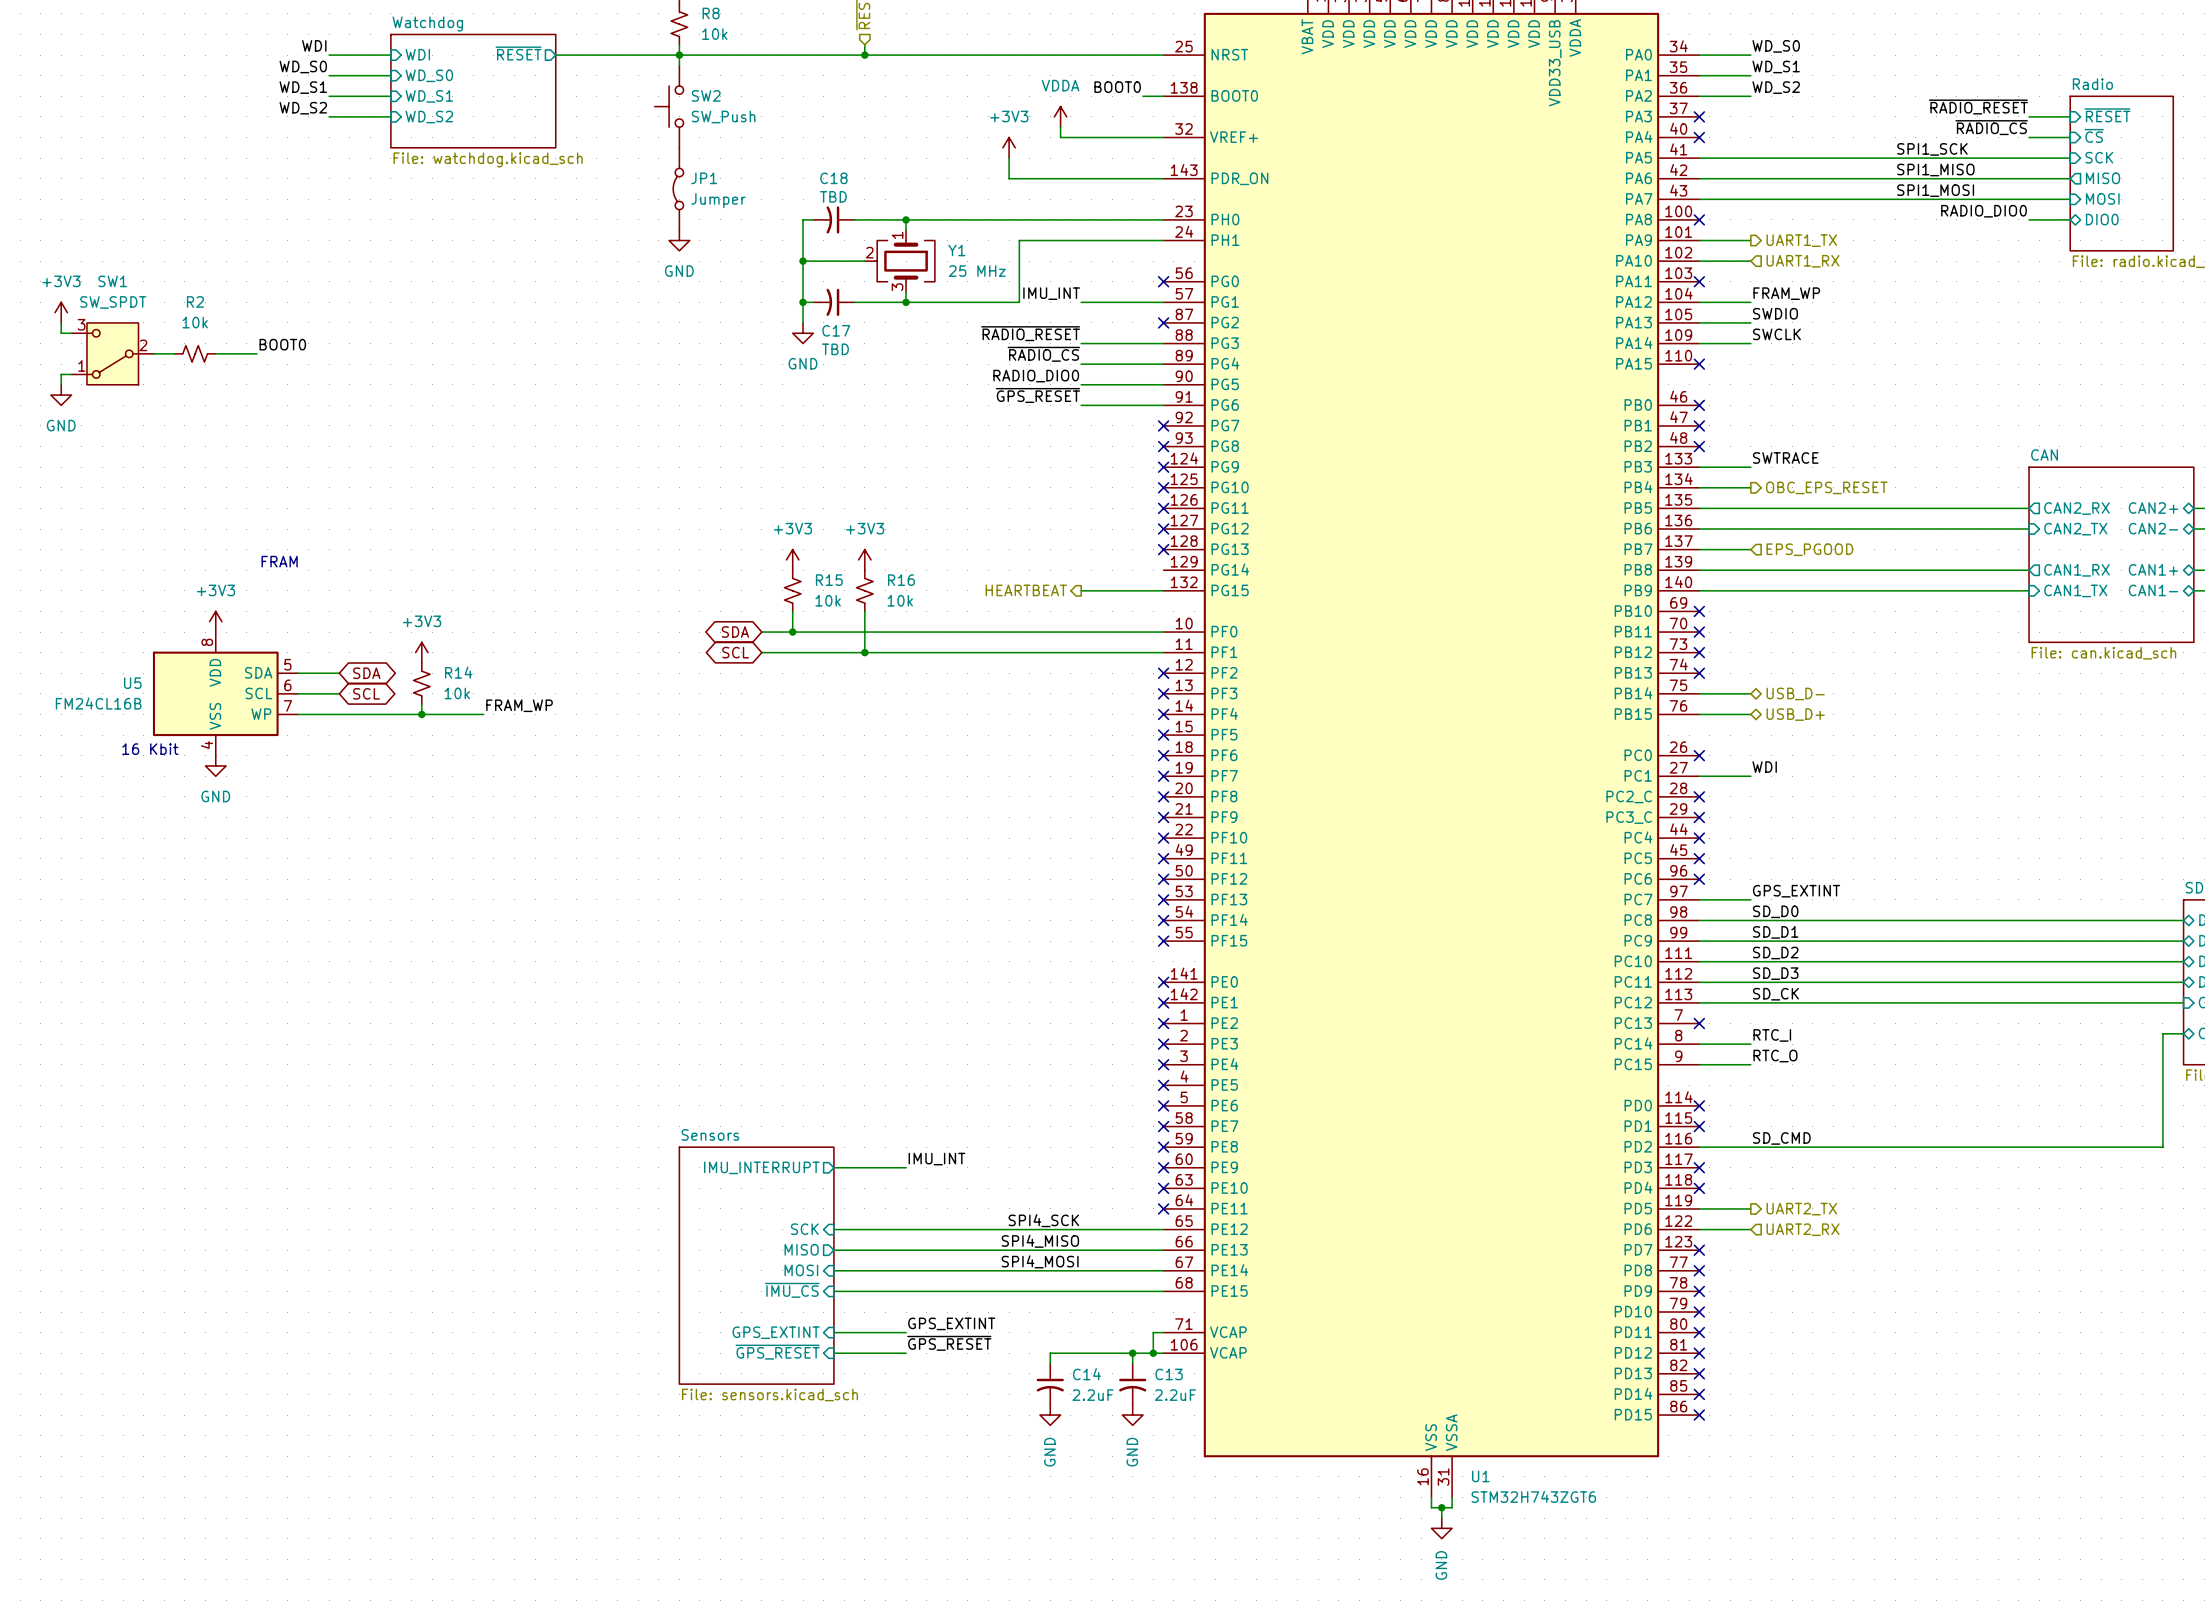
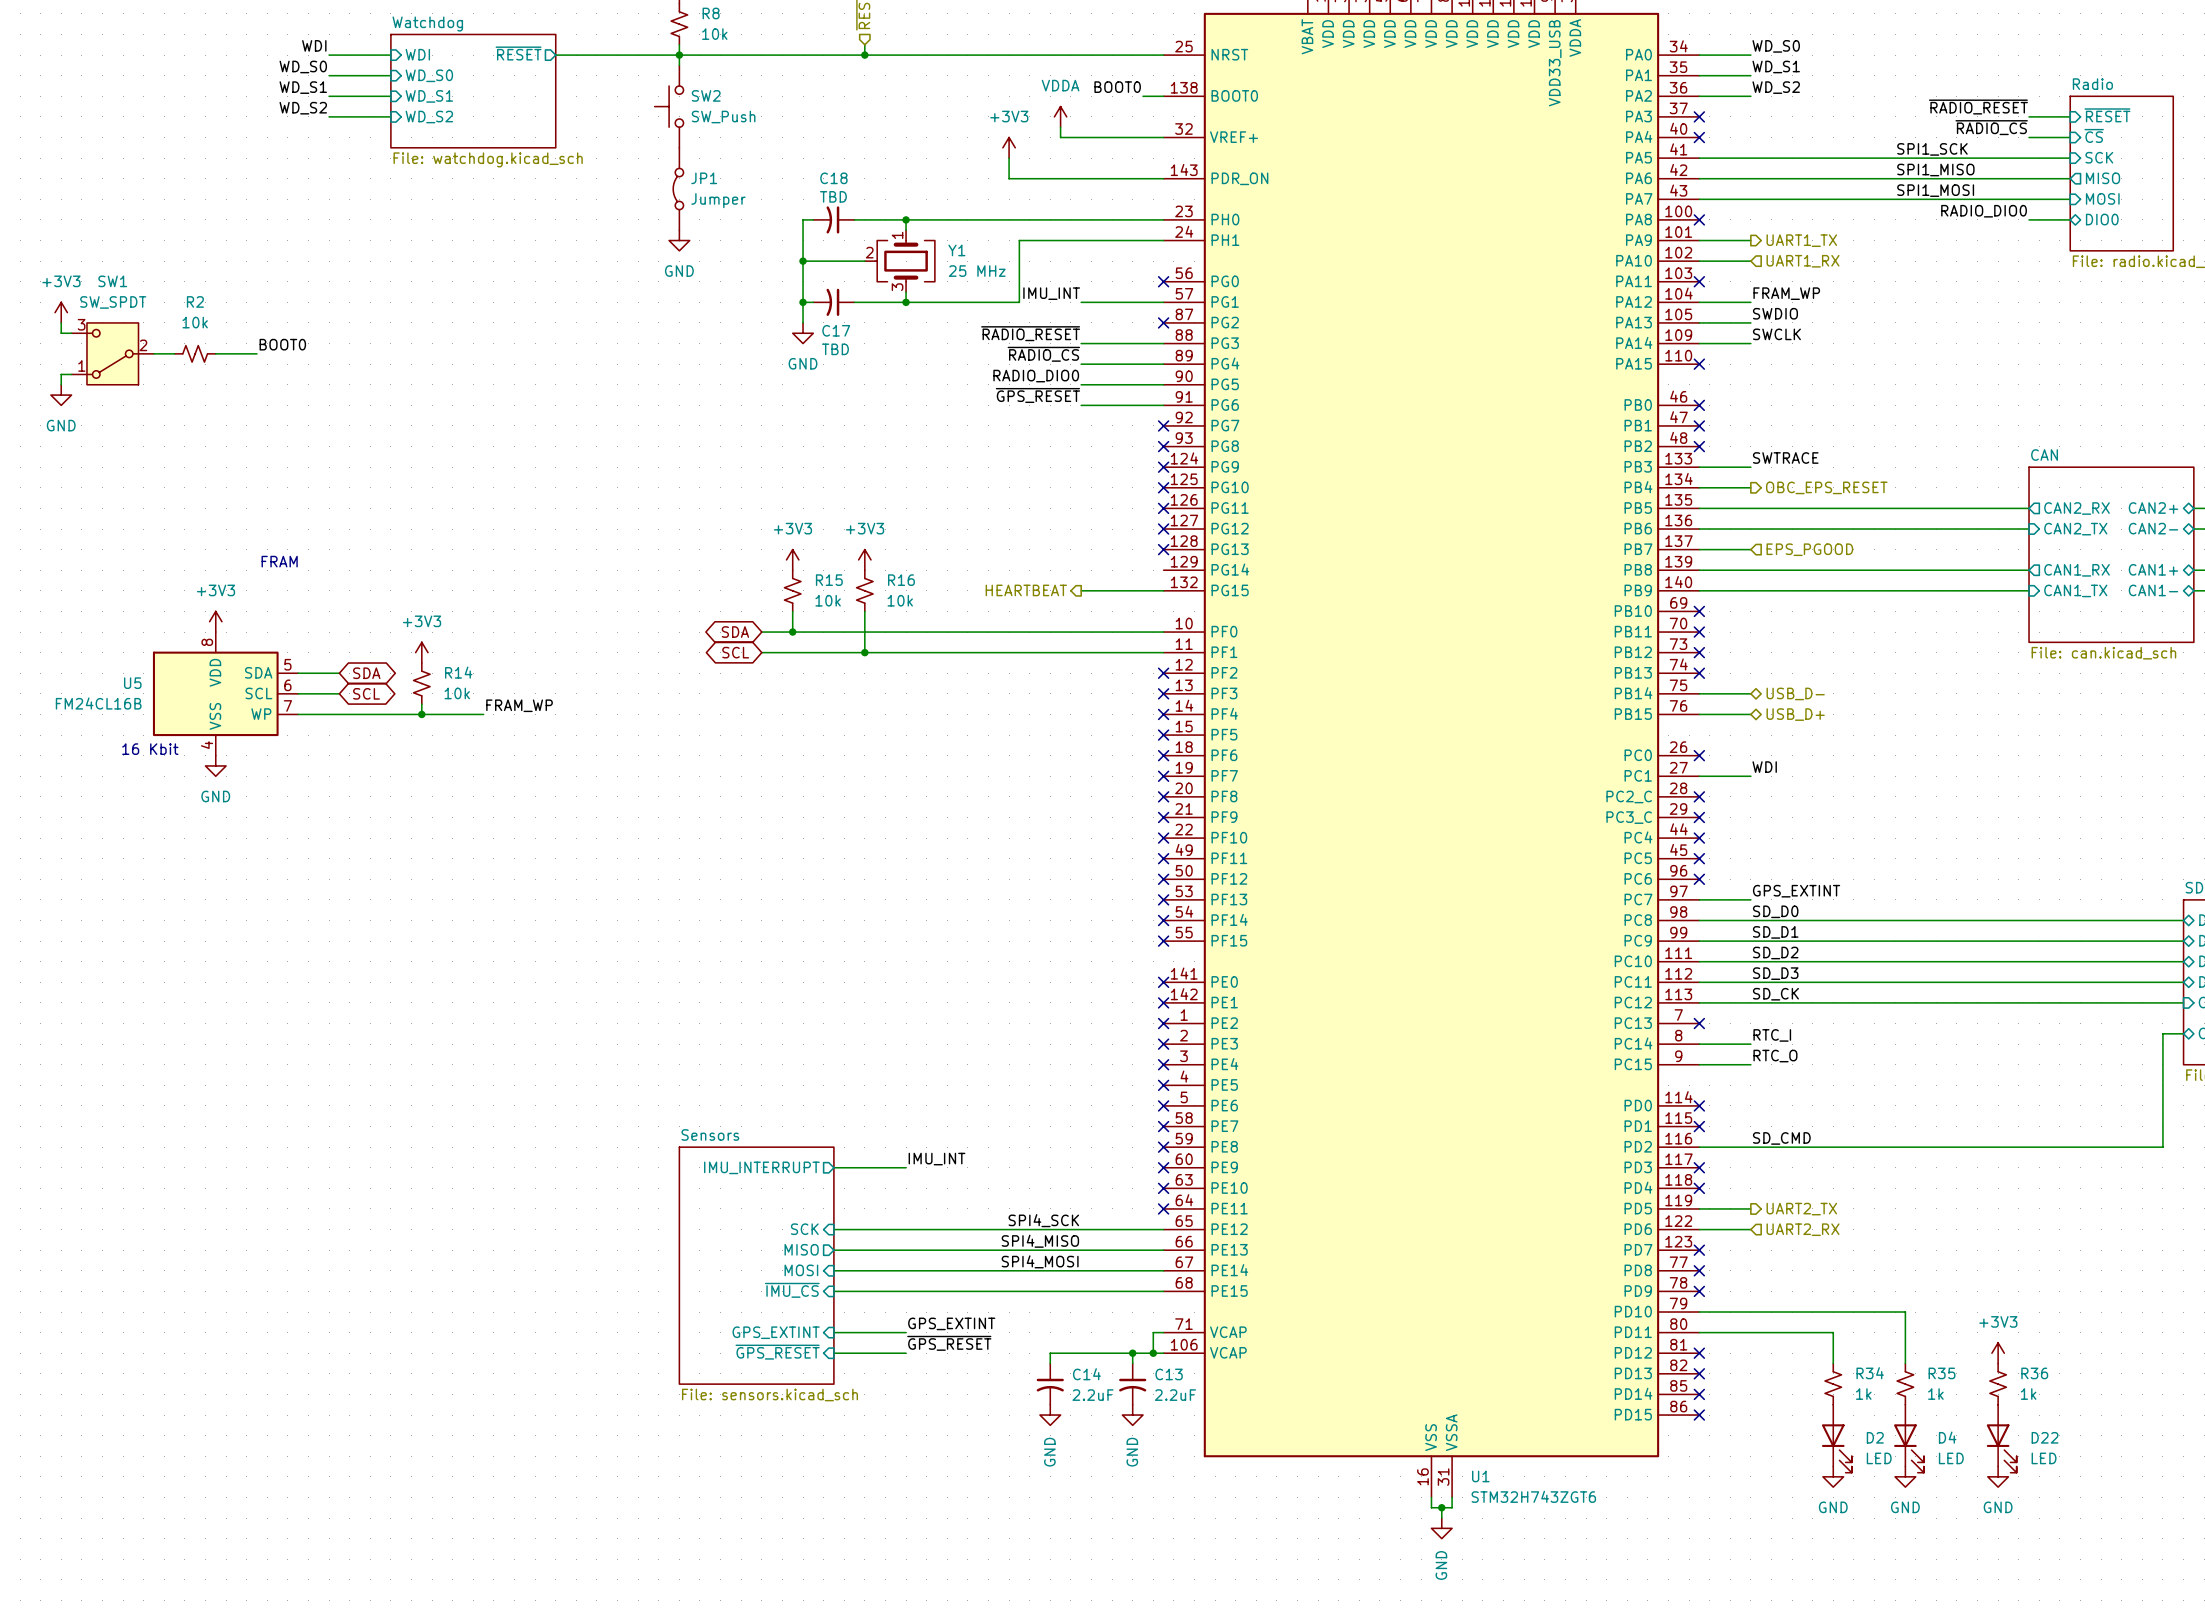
wire: none -> (1699, 1312) (1905, 1312) (1905, 1363)
no-connect mark: (1699, 1312) -> none
wire: none -> (1699, 1332) (1833, 1332) (1833, 1363)
no-connect mark: (1699, 1332) -> none
power symbol: none -> +3V3 (1998, 1353)
R34: none -> 1k (1833, 1384)
R35: none -> 1k (1905, 1384)
R36: none -> 1k (1998, 1384)
D2: none -> LED (1836, 1438)
D4: none -> LED (1908, 1438)
D22: none -> LED (2001, 1438)
power symbol: none -> GND (1833, 1476)
power symbol: none -> GND (1905, 1476)
power symbol: none -> GND (1998, 1476)

